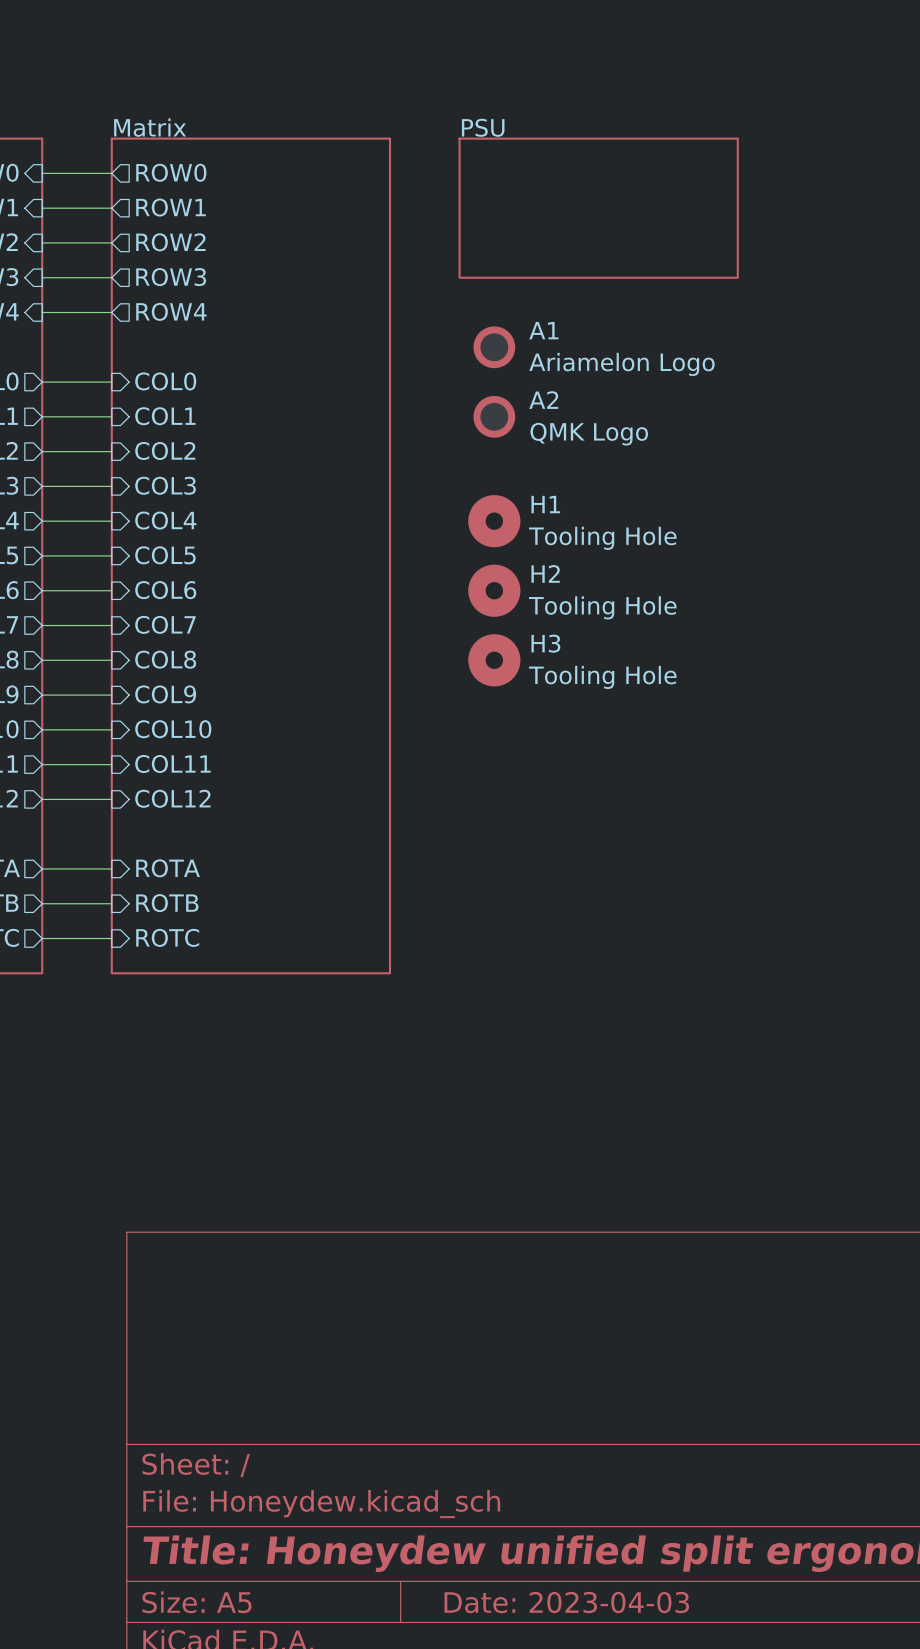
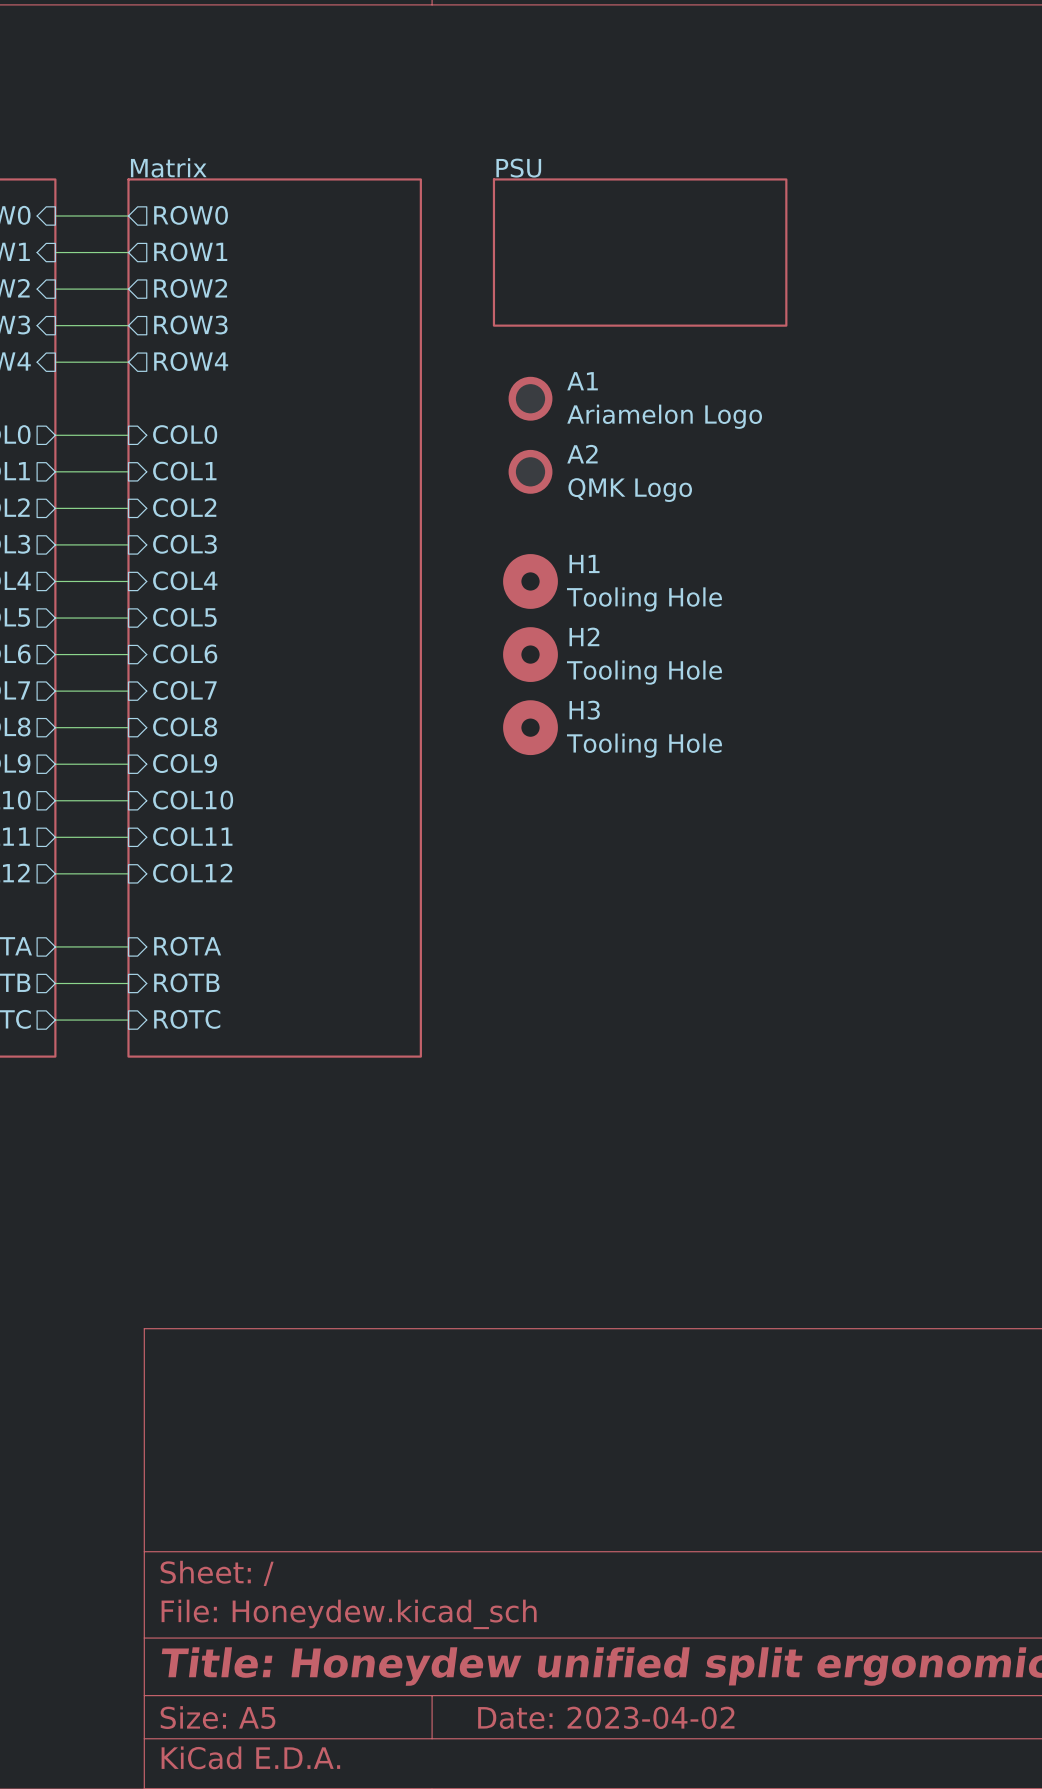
title block: Date: 2023-04-03 (566, 1602) -> Date: 2023-04-02 (606, 1717)

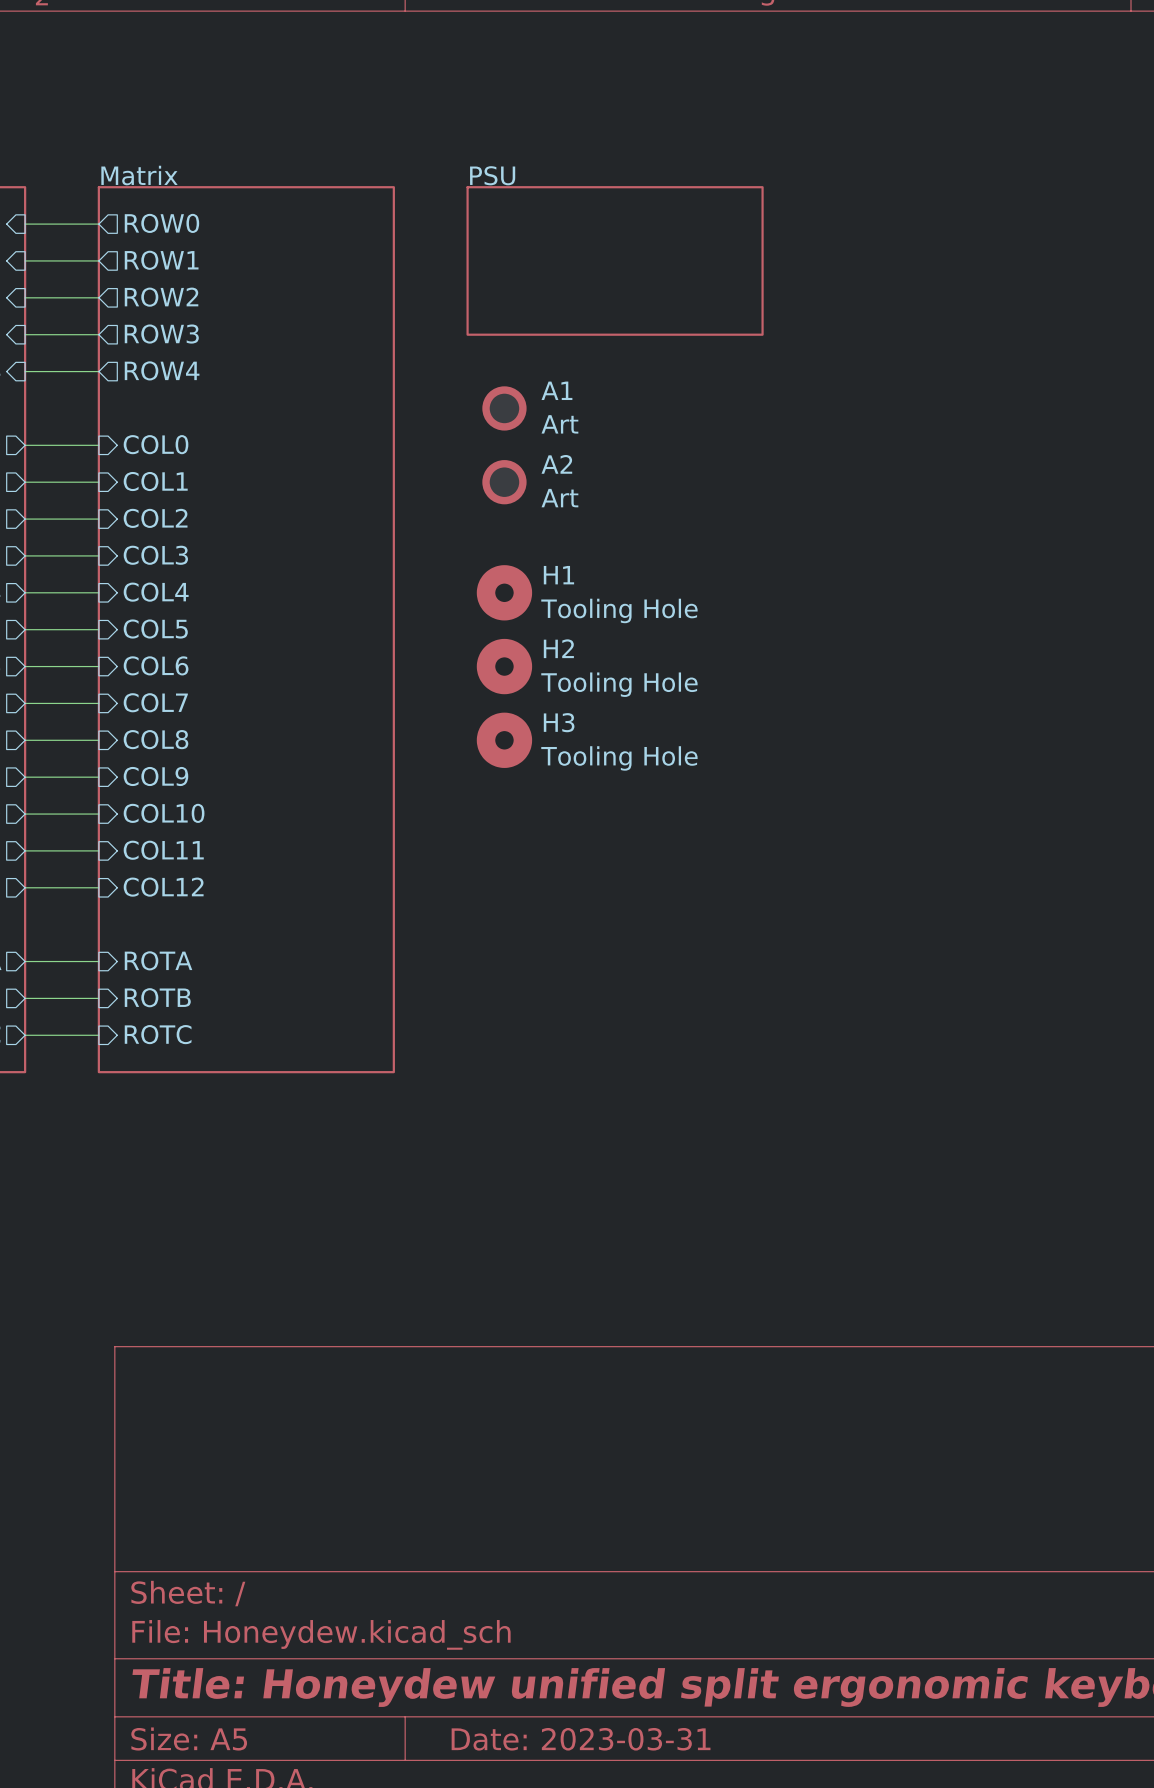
A1 value: Ariamelon Logo (664, 416) -> Art (559, 424)
A2 value: QMK Logo (630, 490) -> Art (559, 498)
title block: Date: 2023-04-02 (606, 1717) -> Date: 2023-03-31 (581, 1739)

